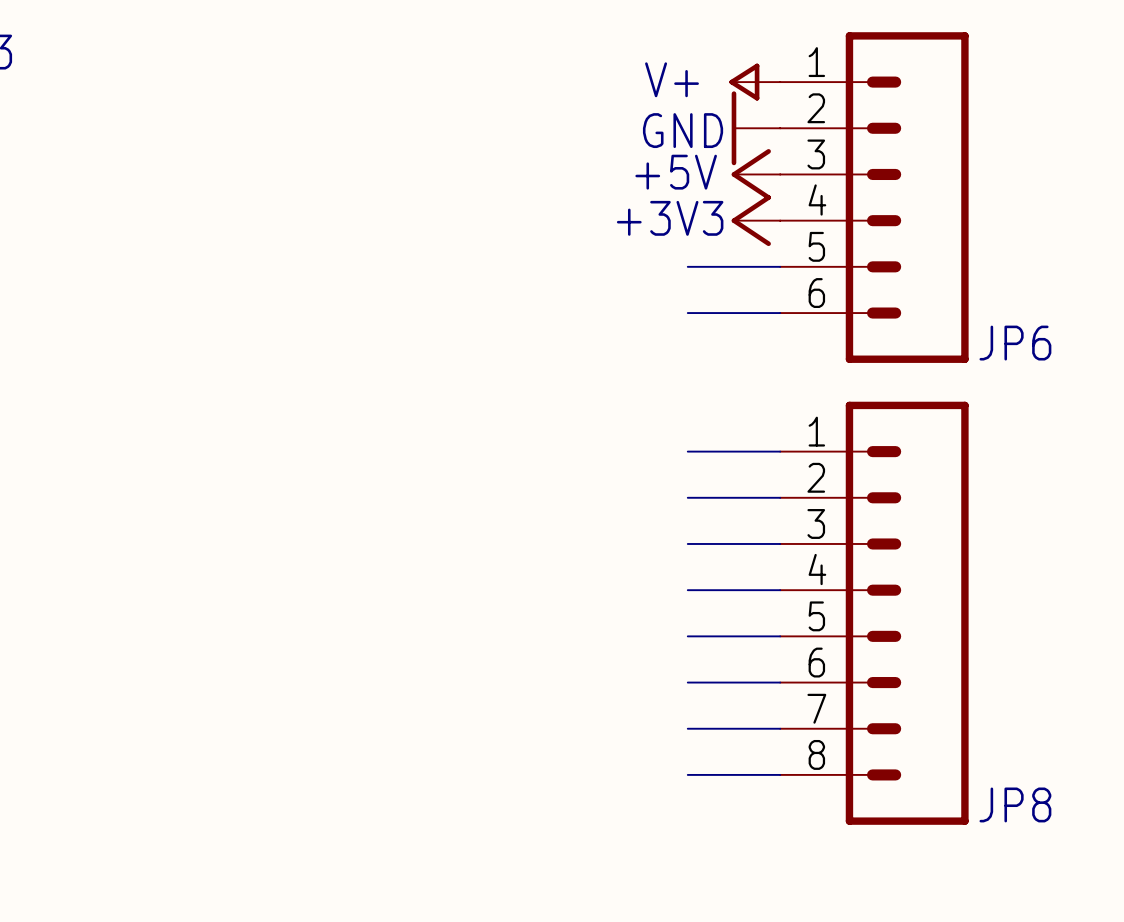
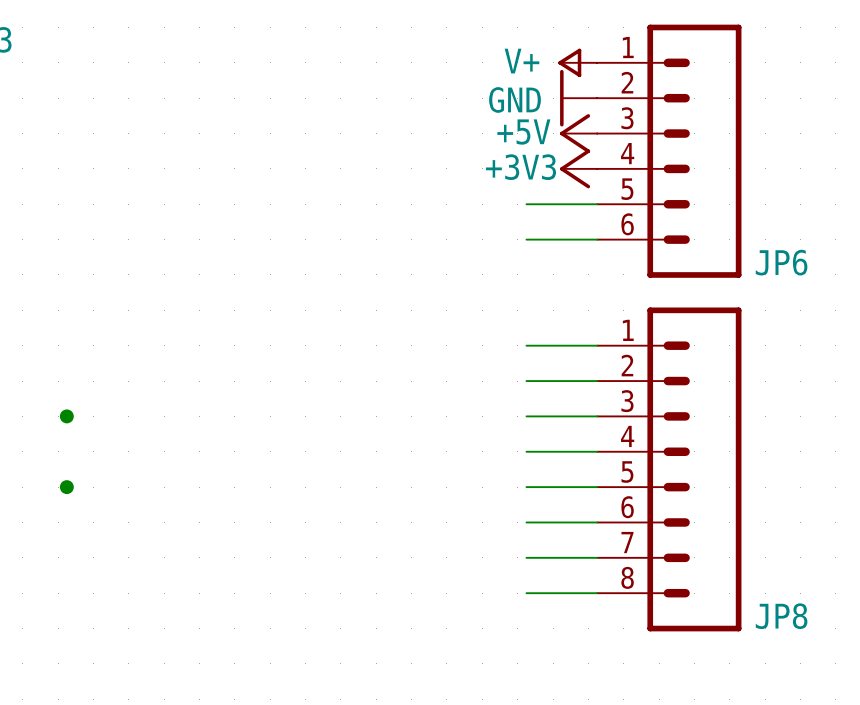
junction: none -> (66, 416)
junction: none -> (66, 487)

